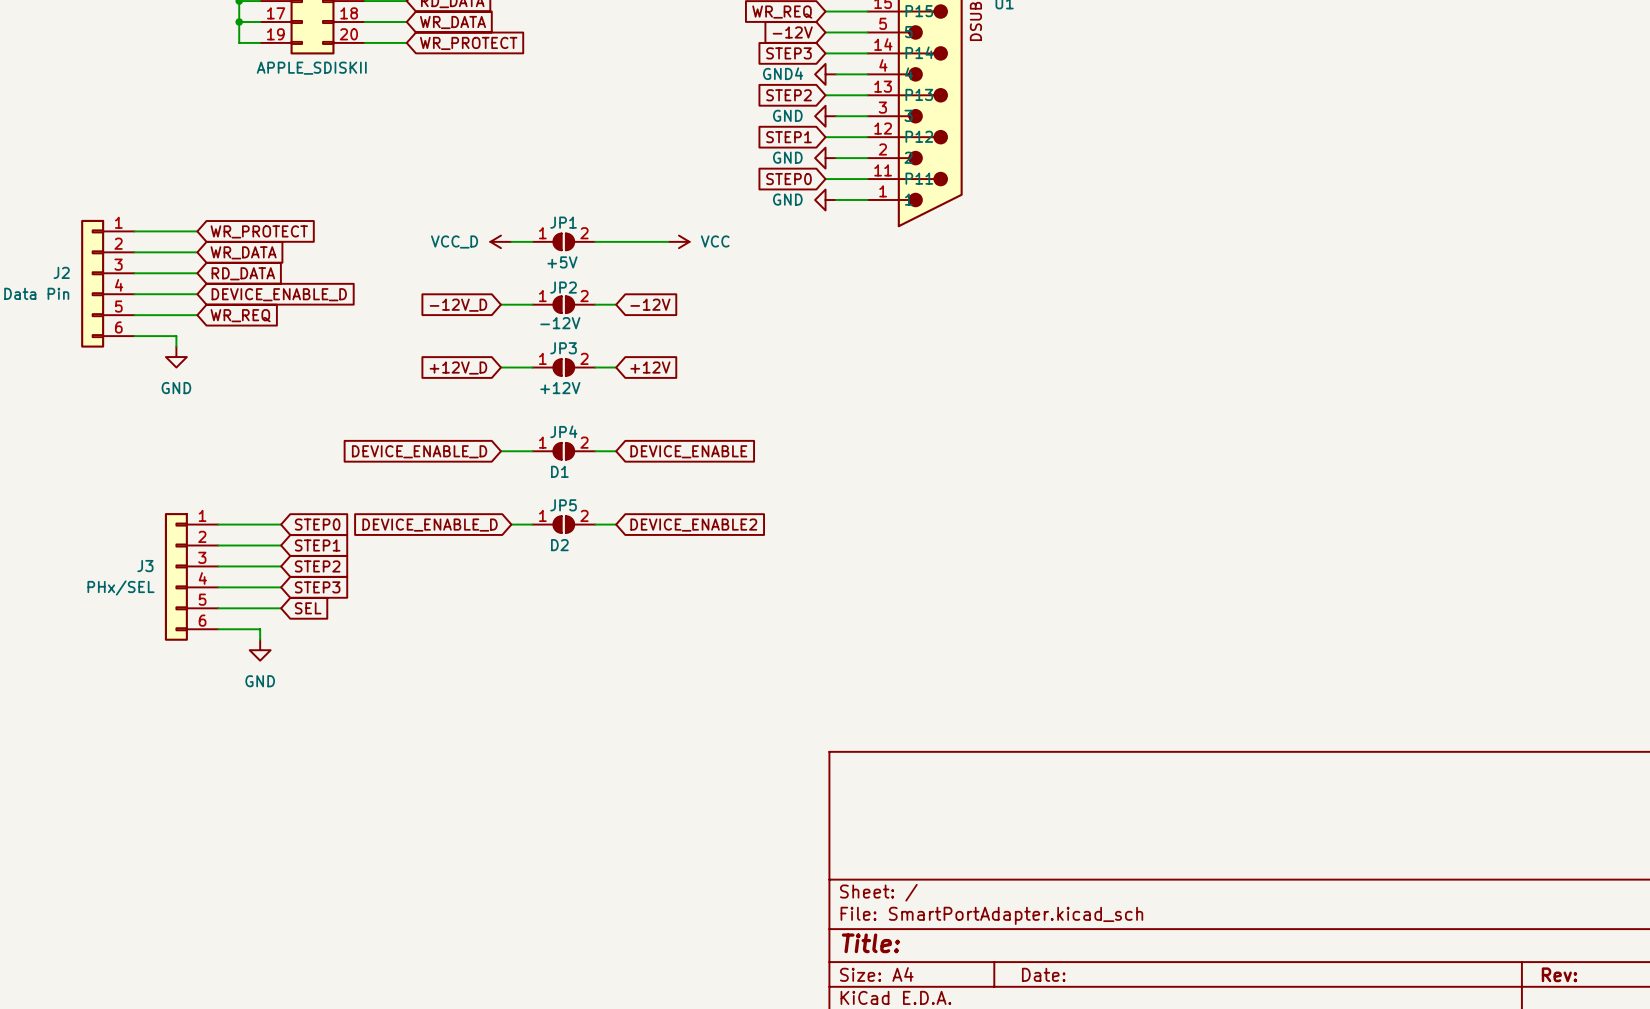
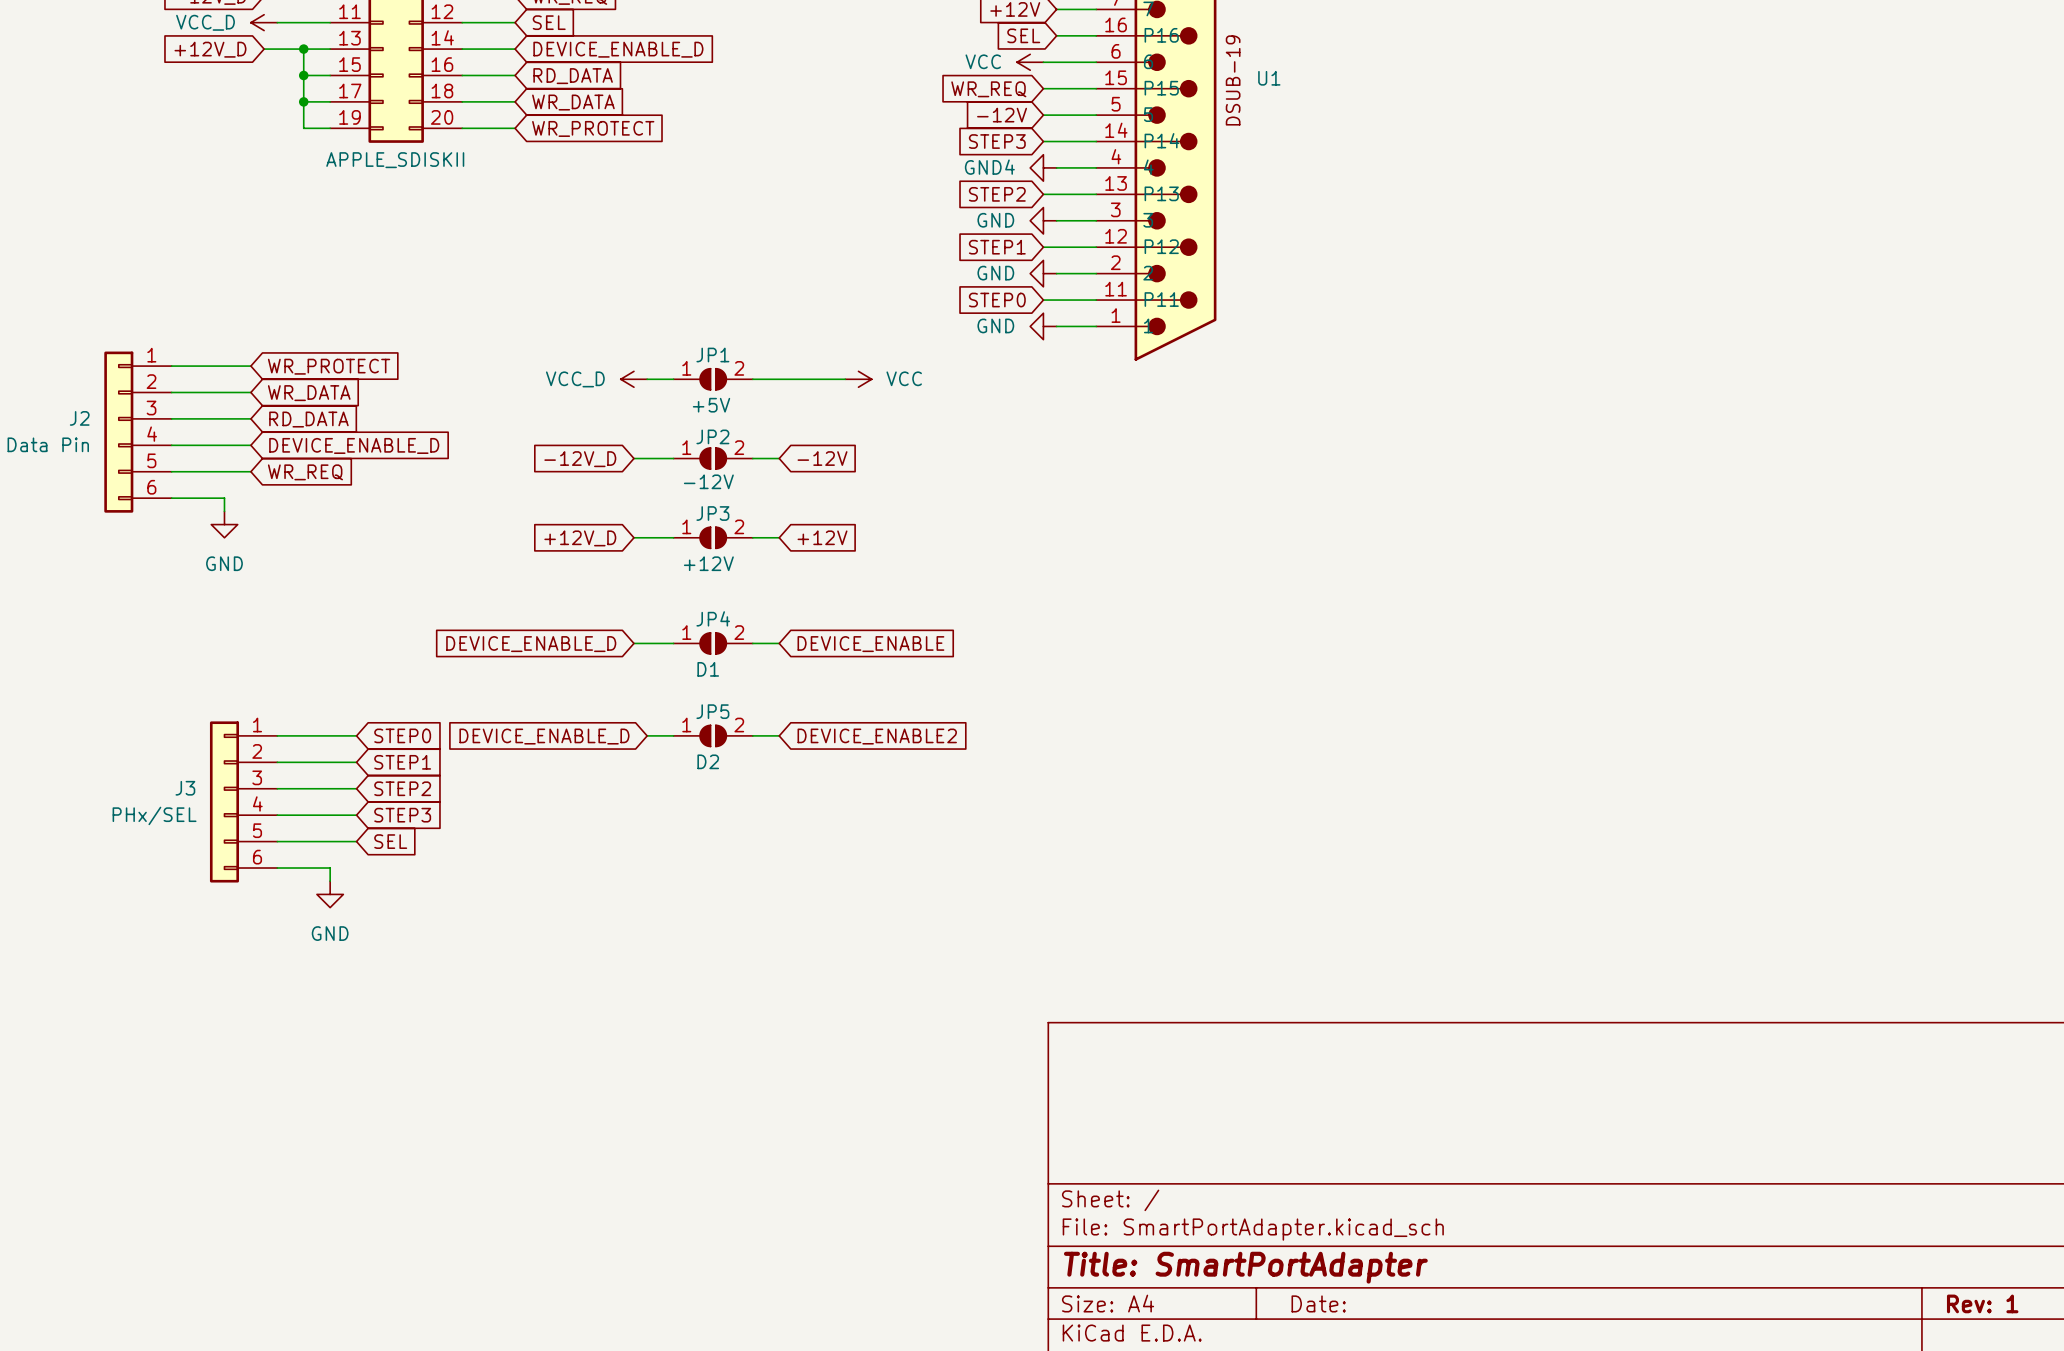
title block: Title: (870, 943) -> Title: SmartPortAdapter (1245, 1267)
title block: Rev: (1559, 974) -> Rev: 1 (1982, 1303)

